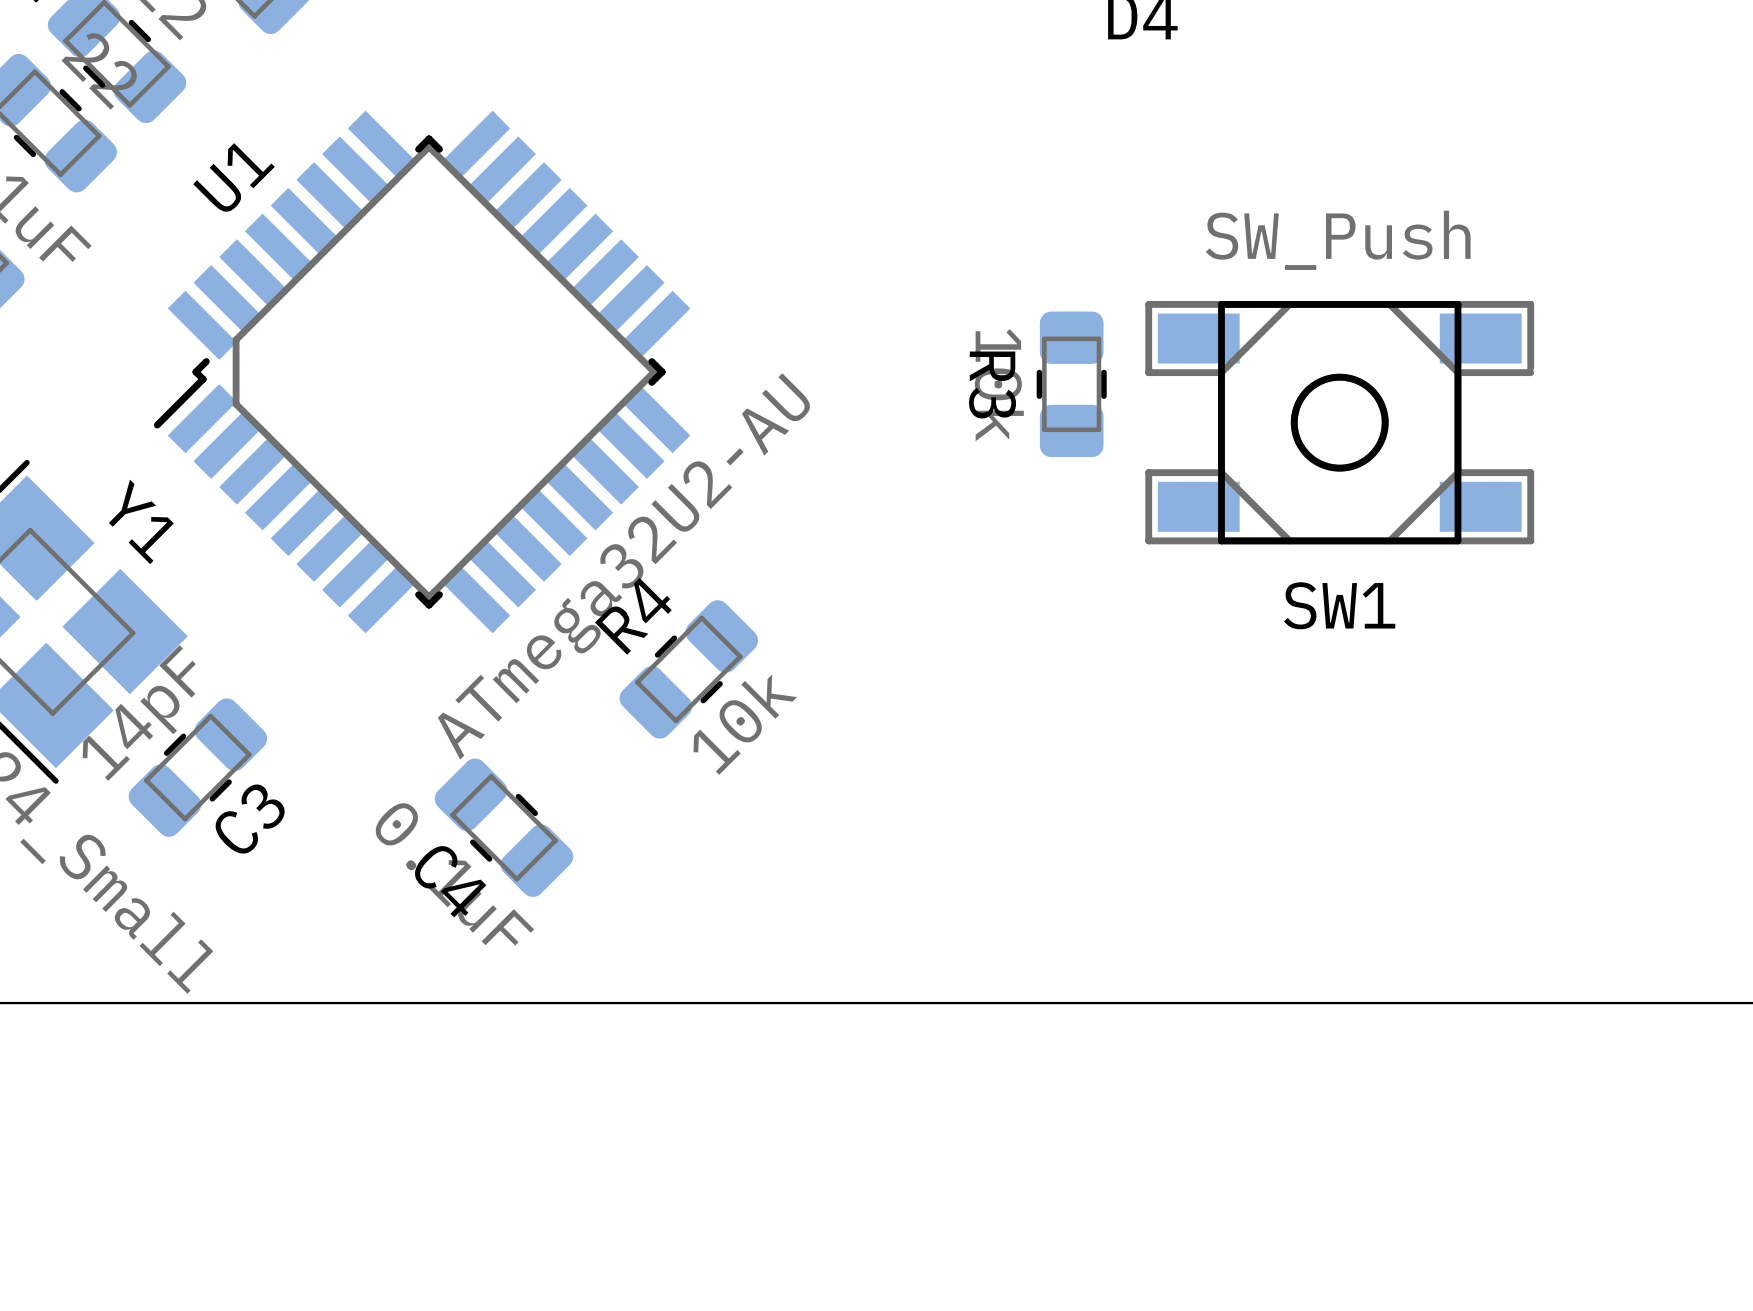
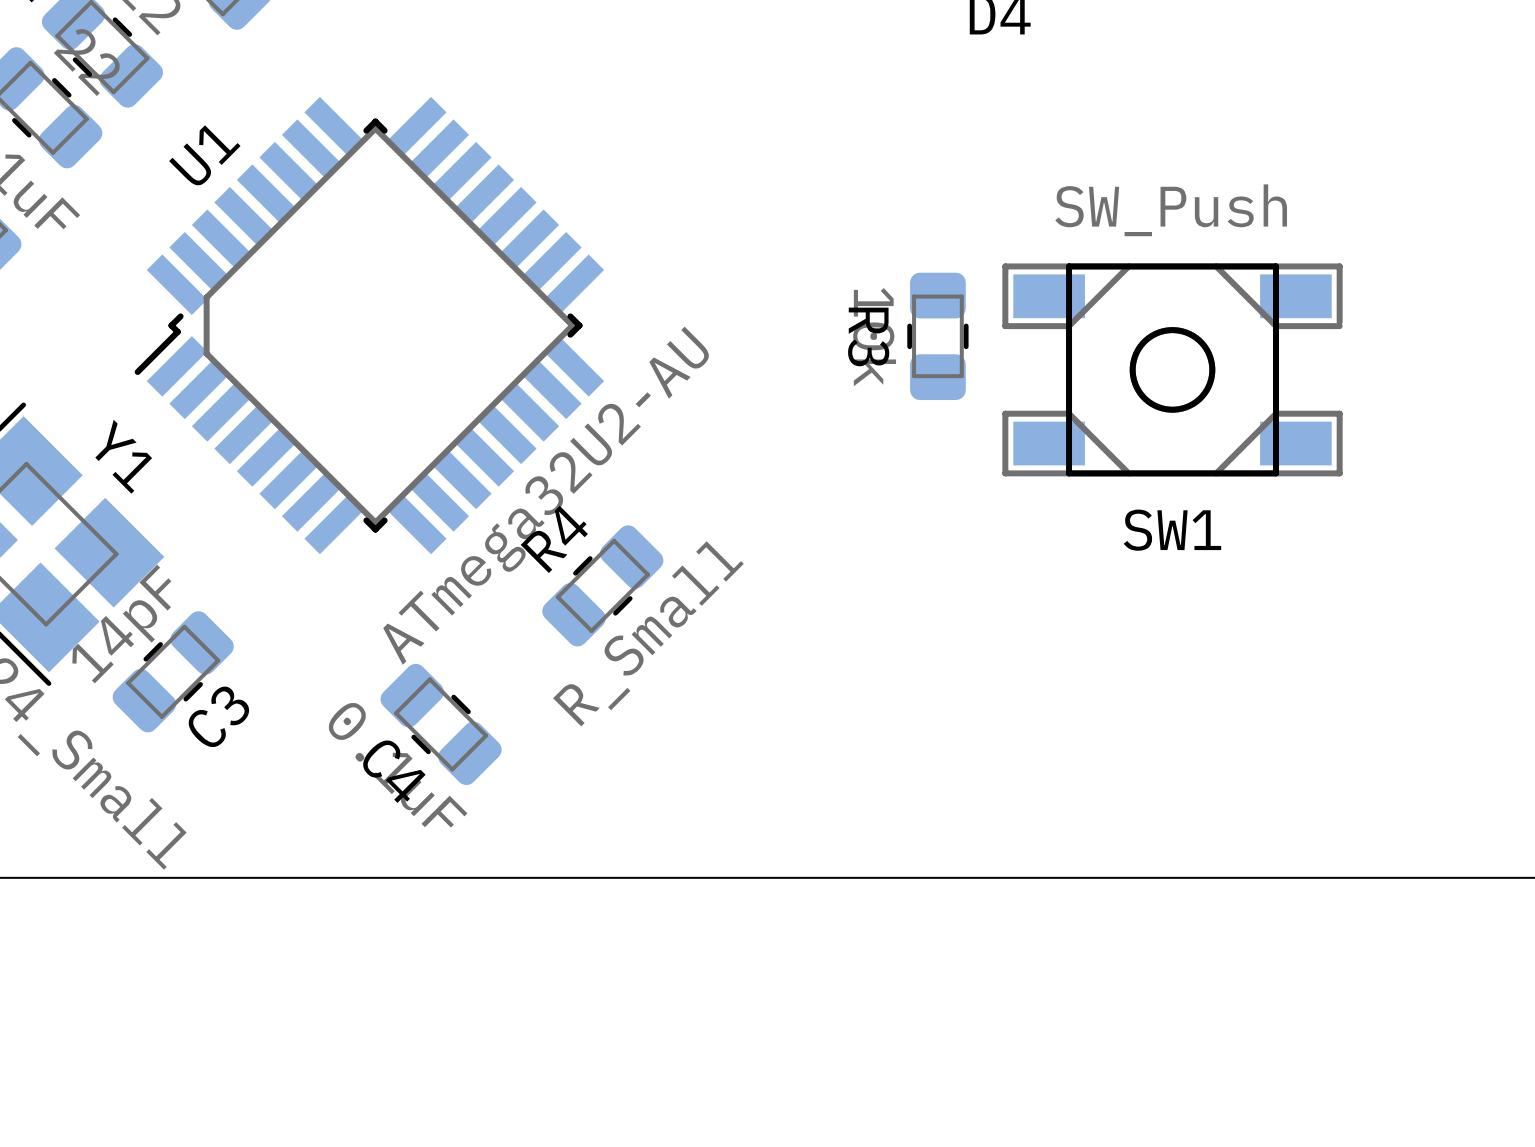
R4 value: 10k (745, 724) -> R_Small (648, 633)

